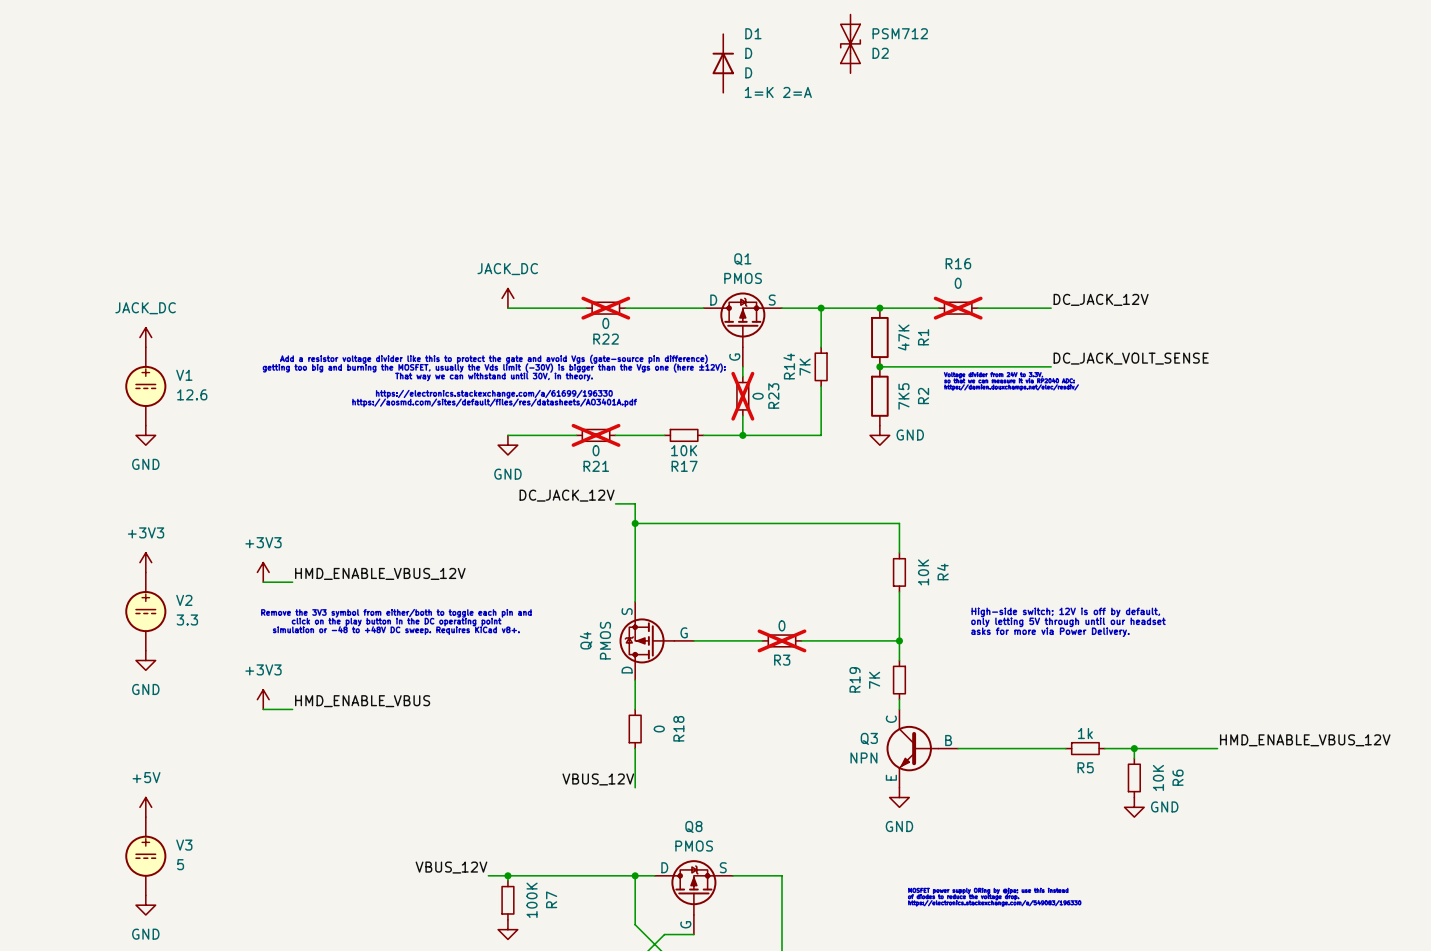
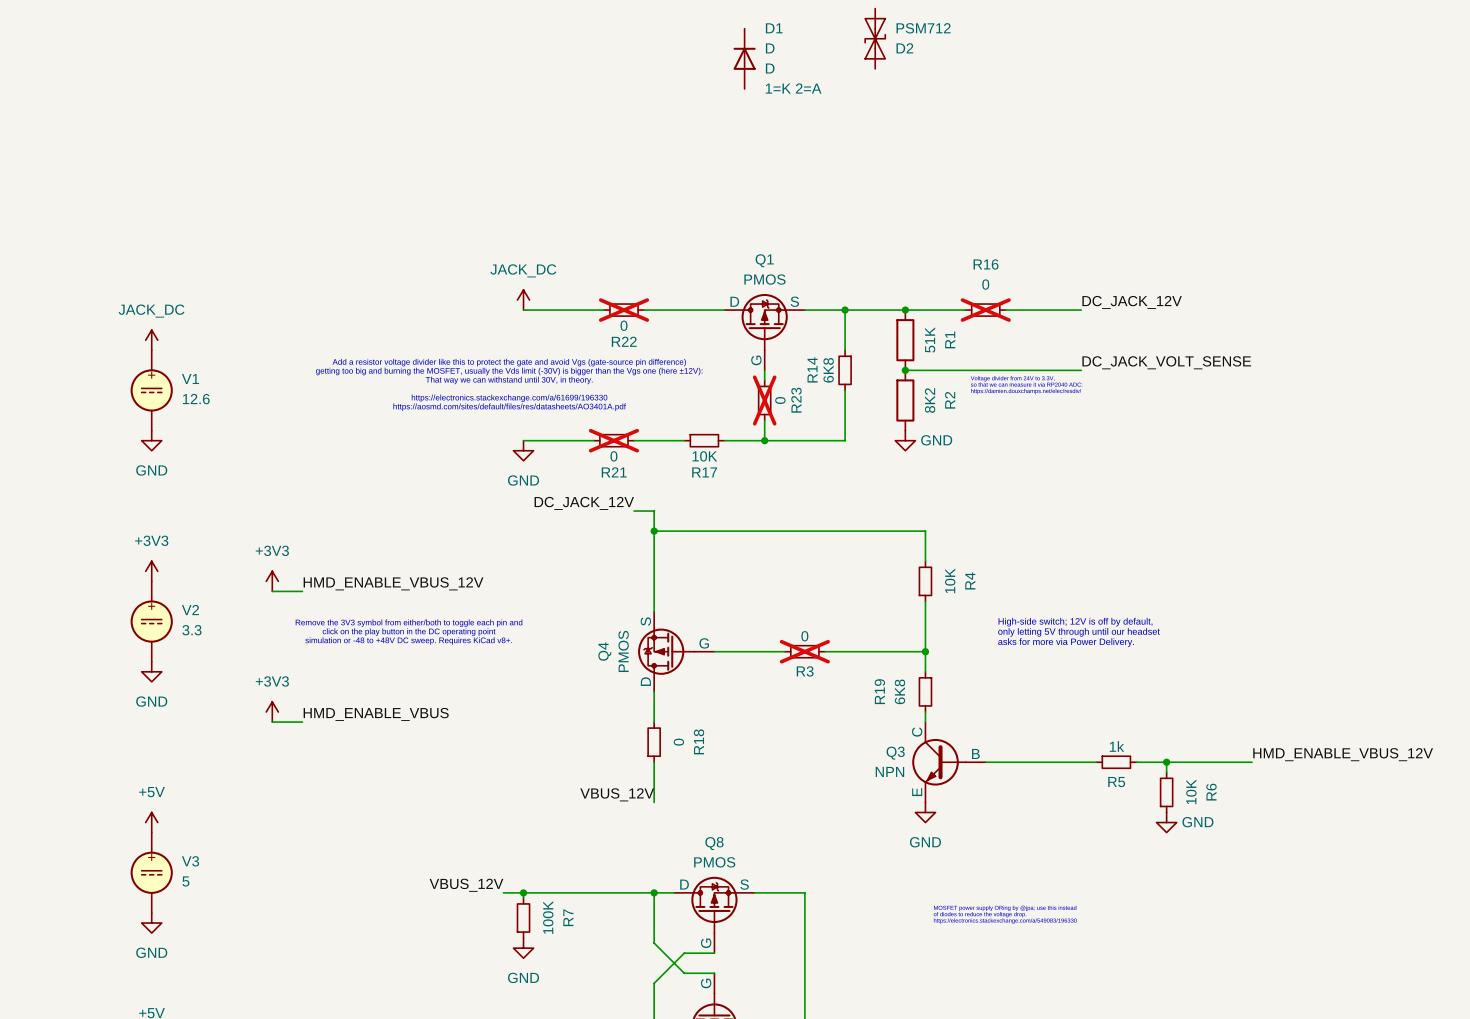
R1 value: 47K (903, 337) -> 51K (930, 339)
R14 value: 7K (805, 367) -> 6K8 (828, 370)
R2 value: 7K5 (903, 396) -> 8K2 (930, 400)
R19 value: 7K (874, 680) -> 6K8 (899, 691)

